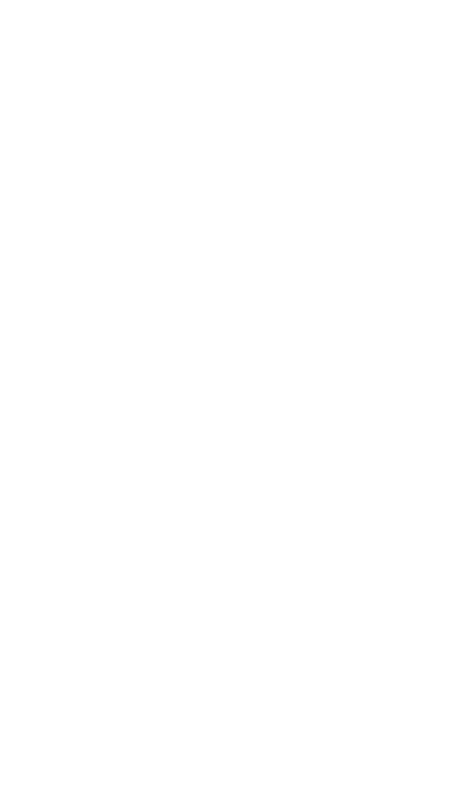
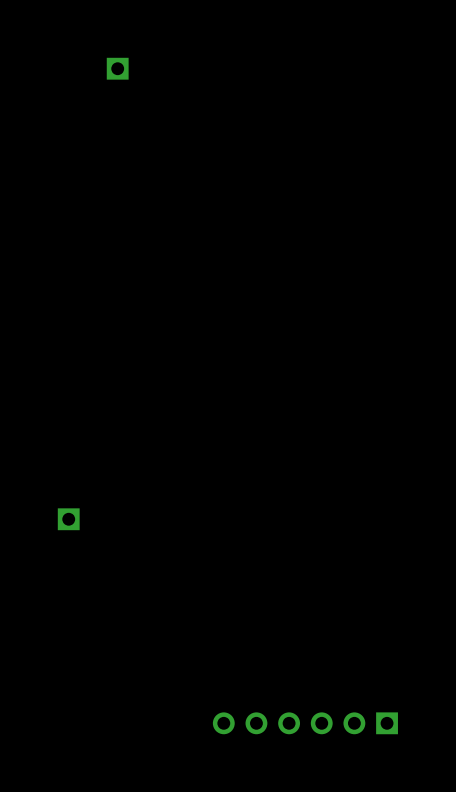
part: none -> (117, 68)
part: none -> (68, 519)
part: none -> (305, 723)

